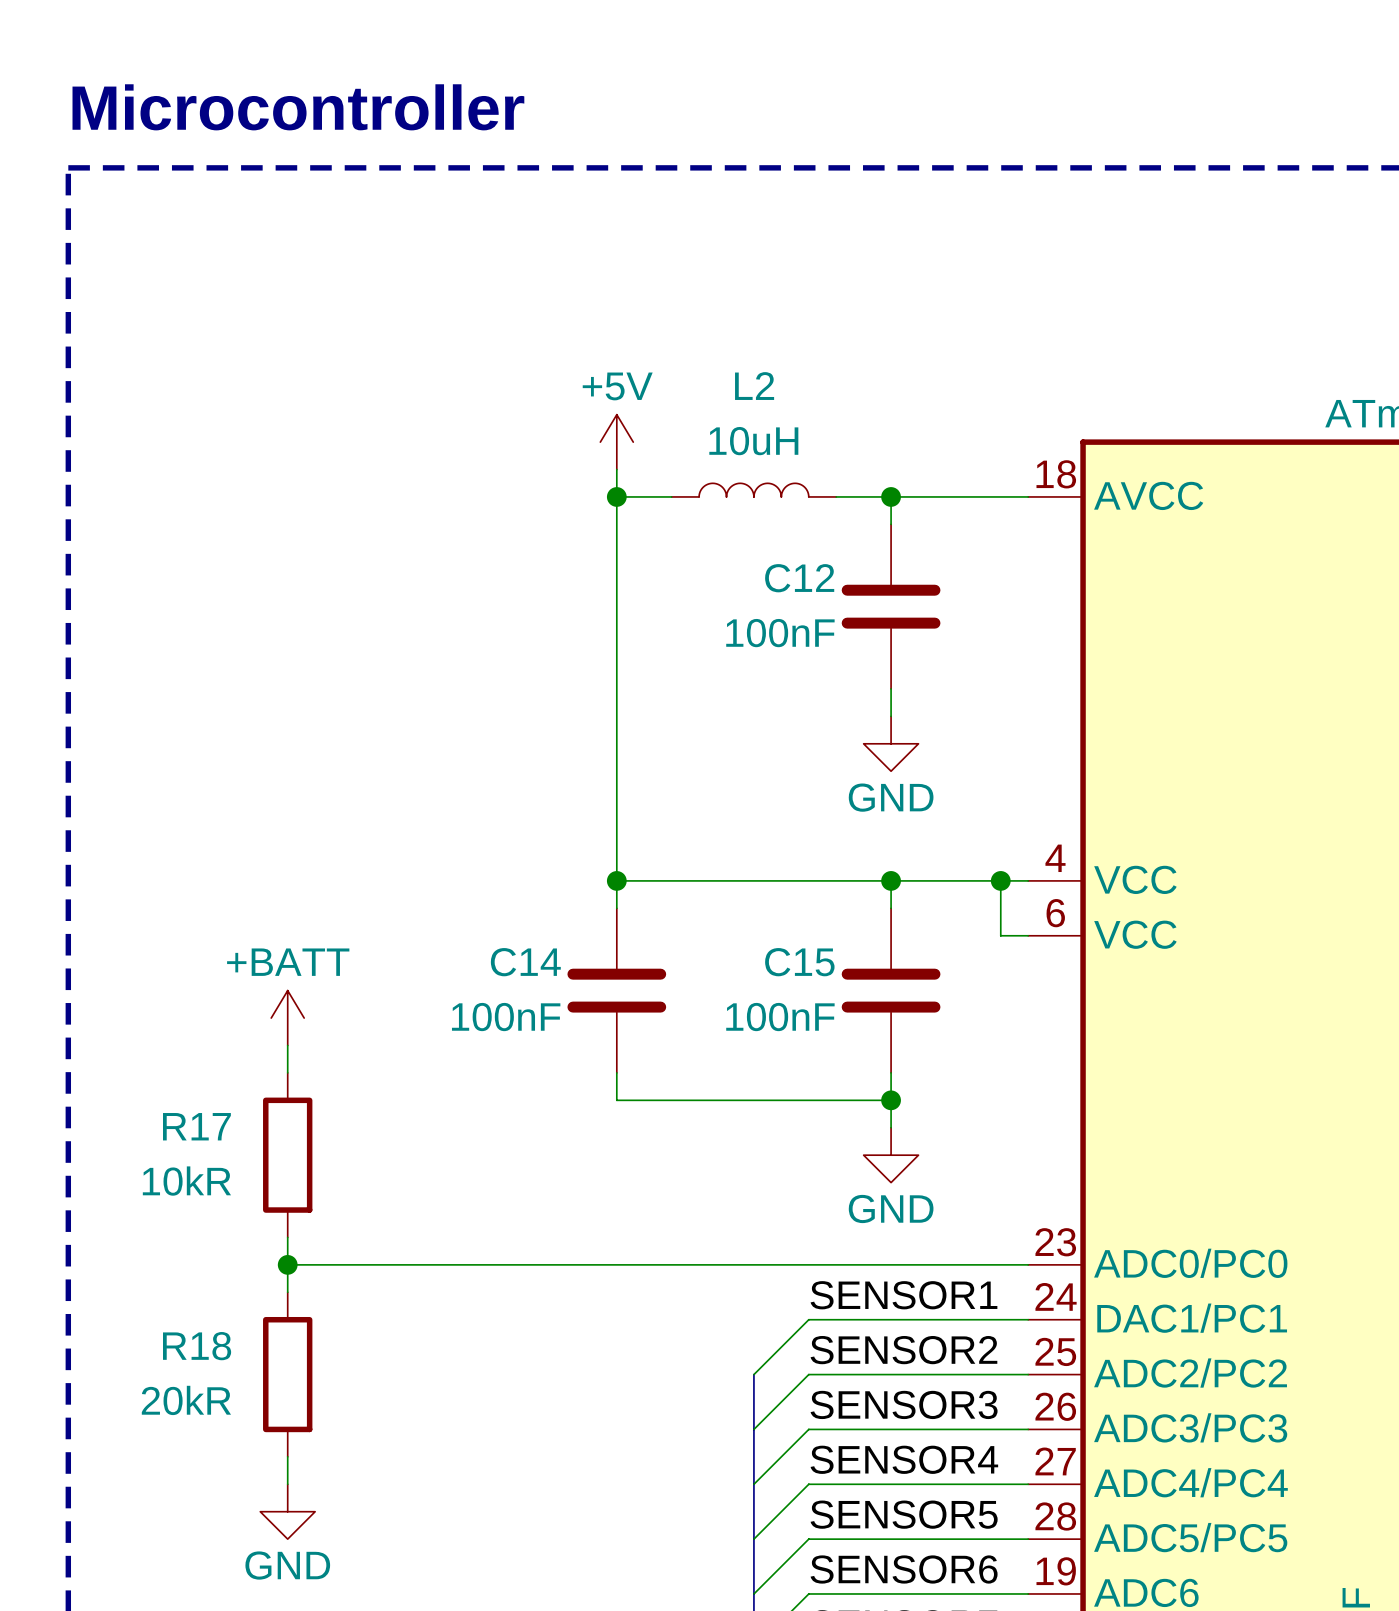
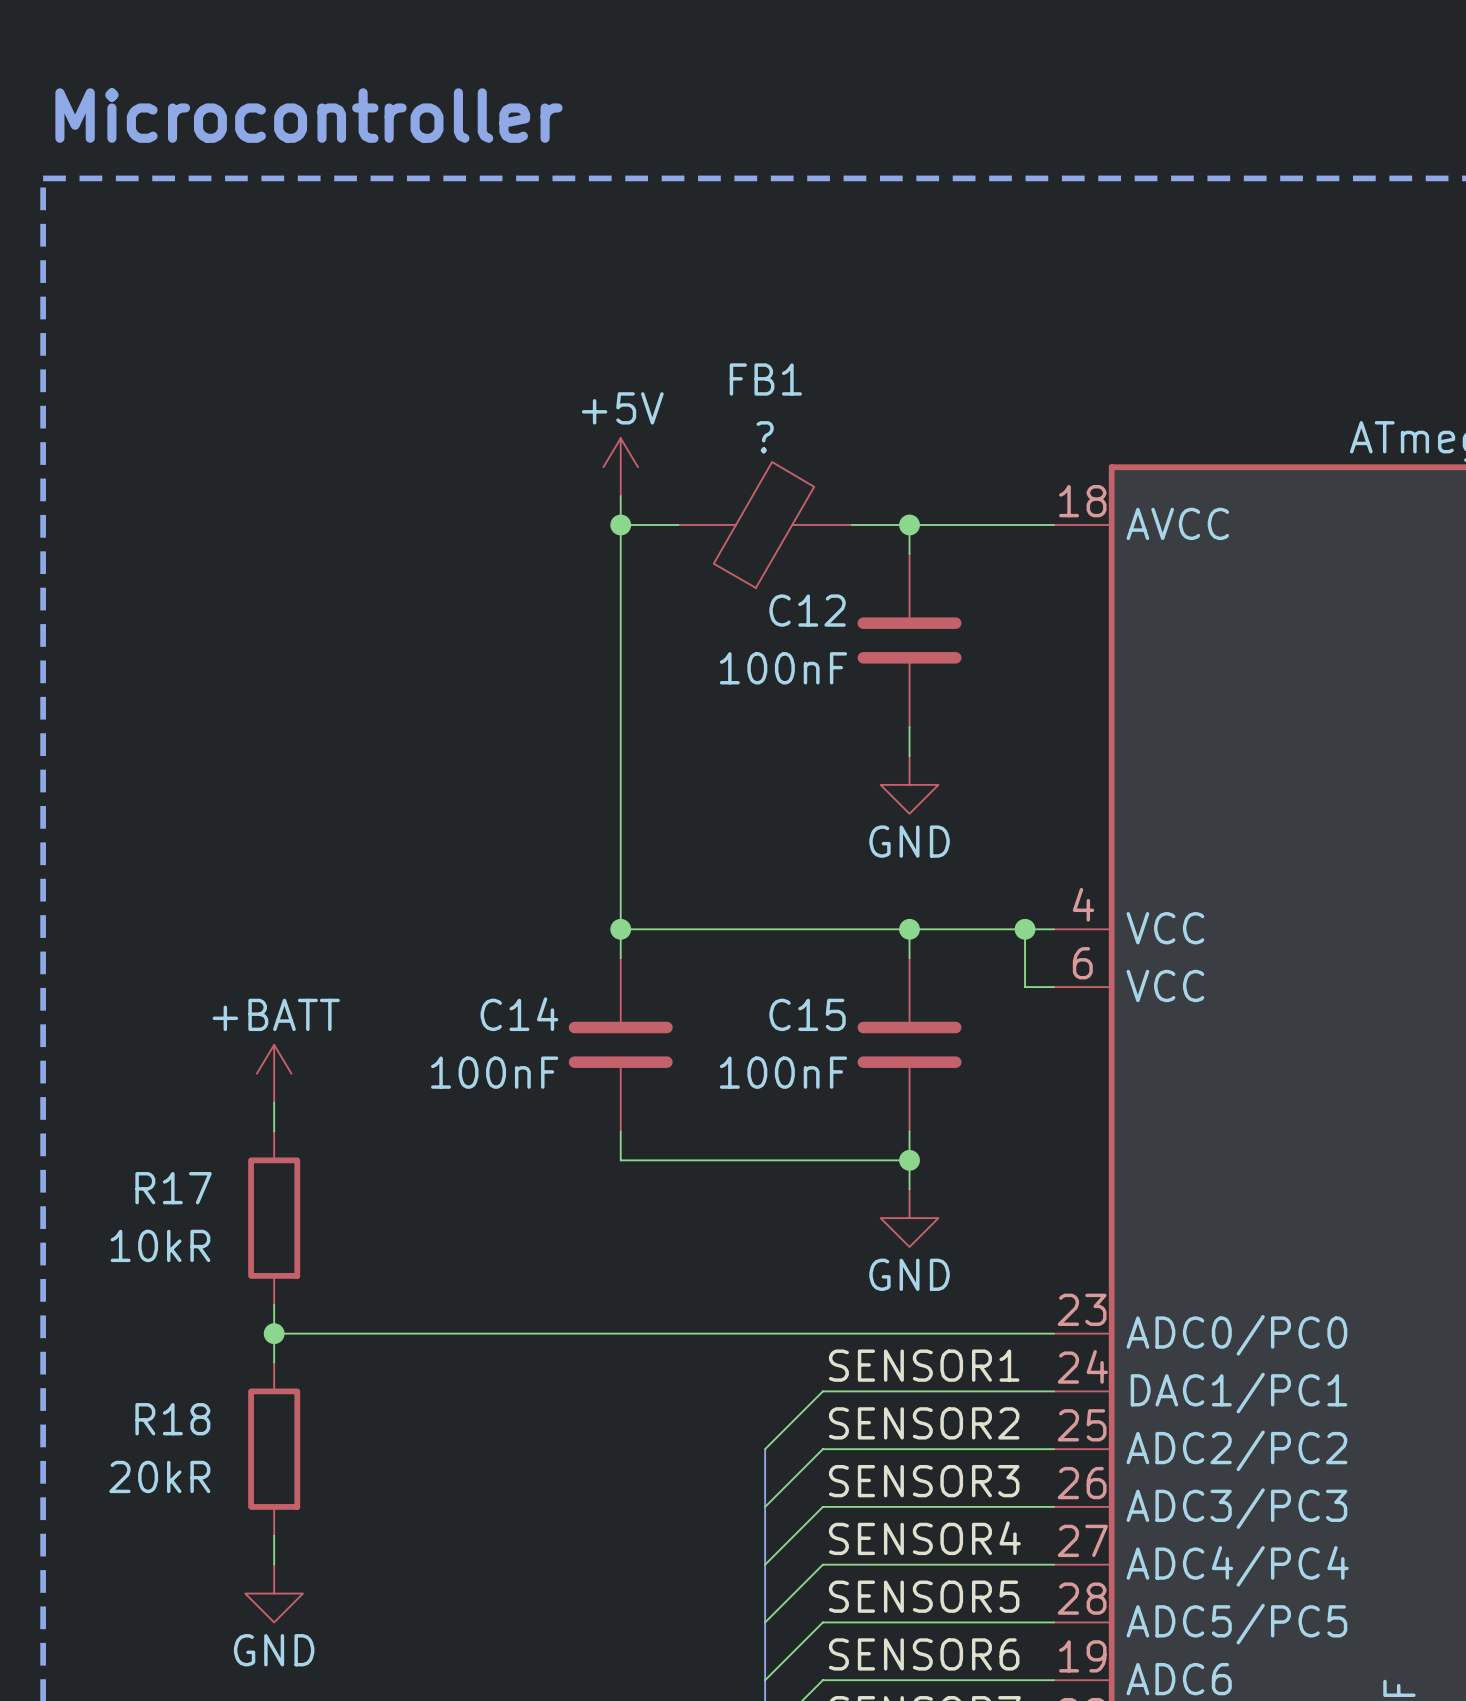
L2: 10uH (753, 490) -> none
FB1: none -> ? (765, 524)

